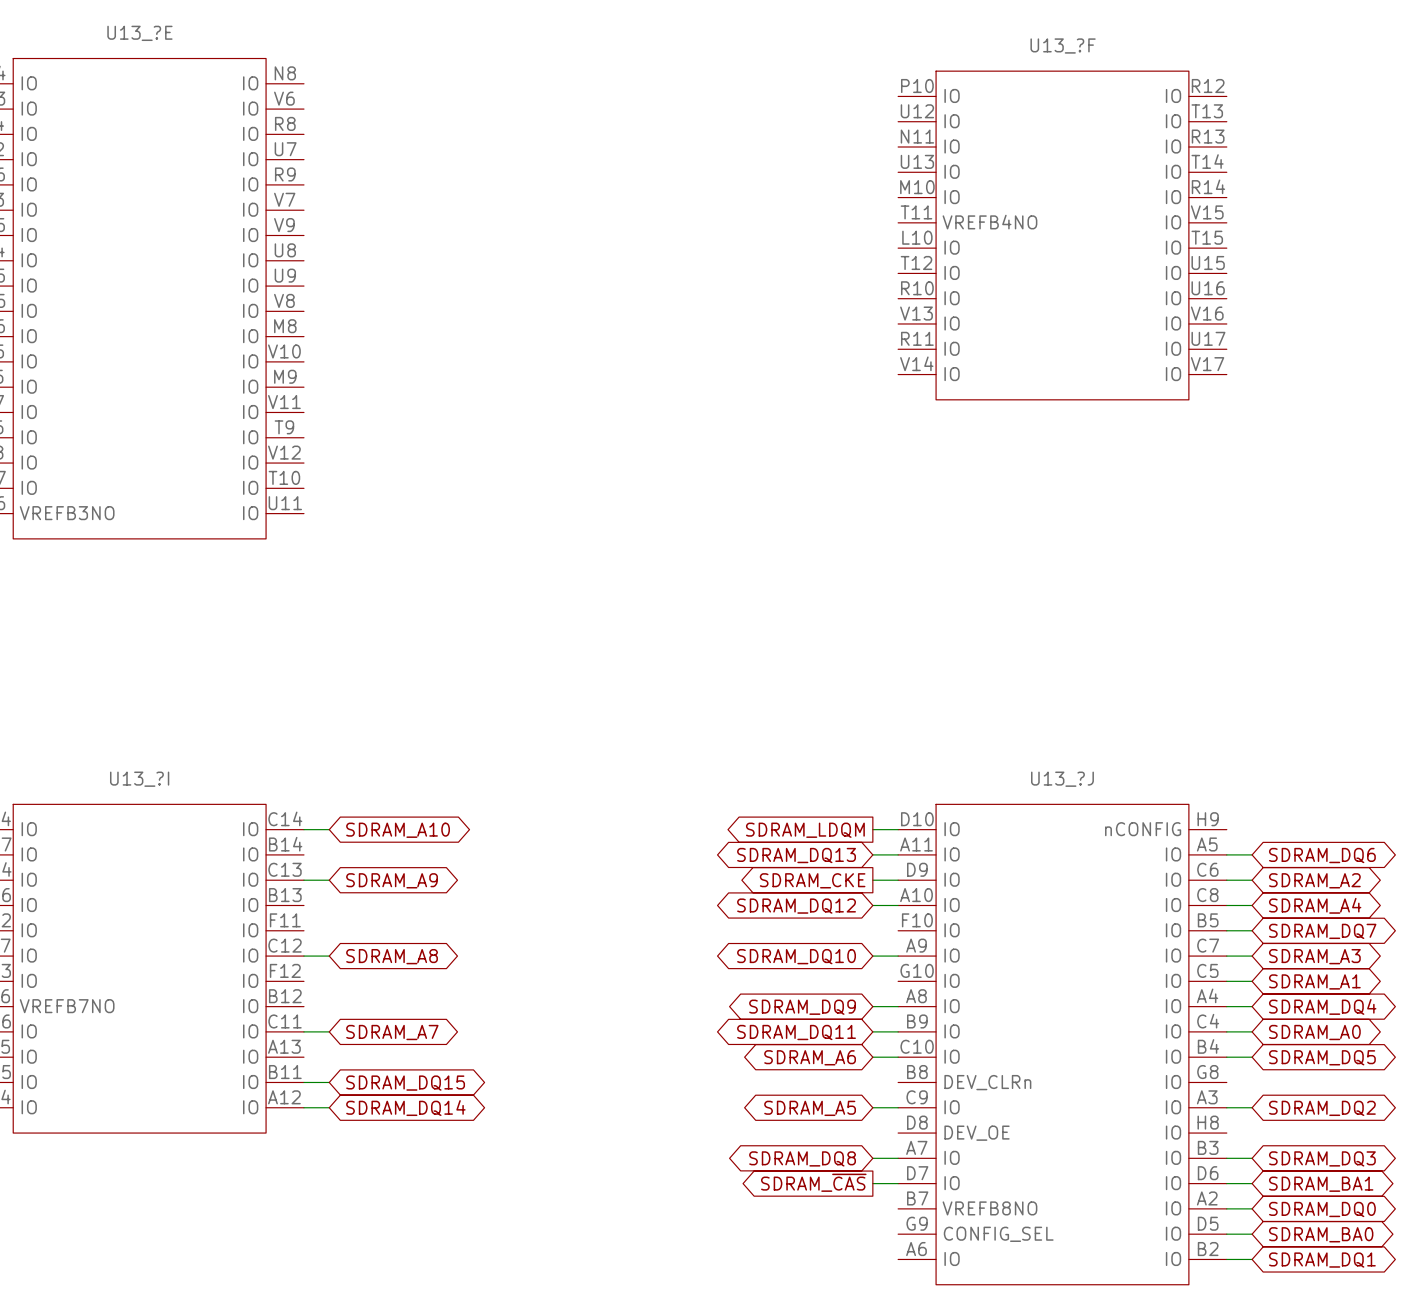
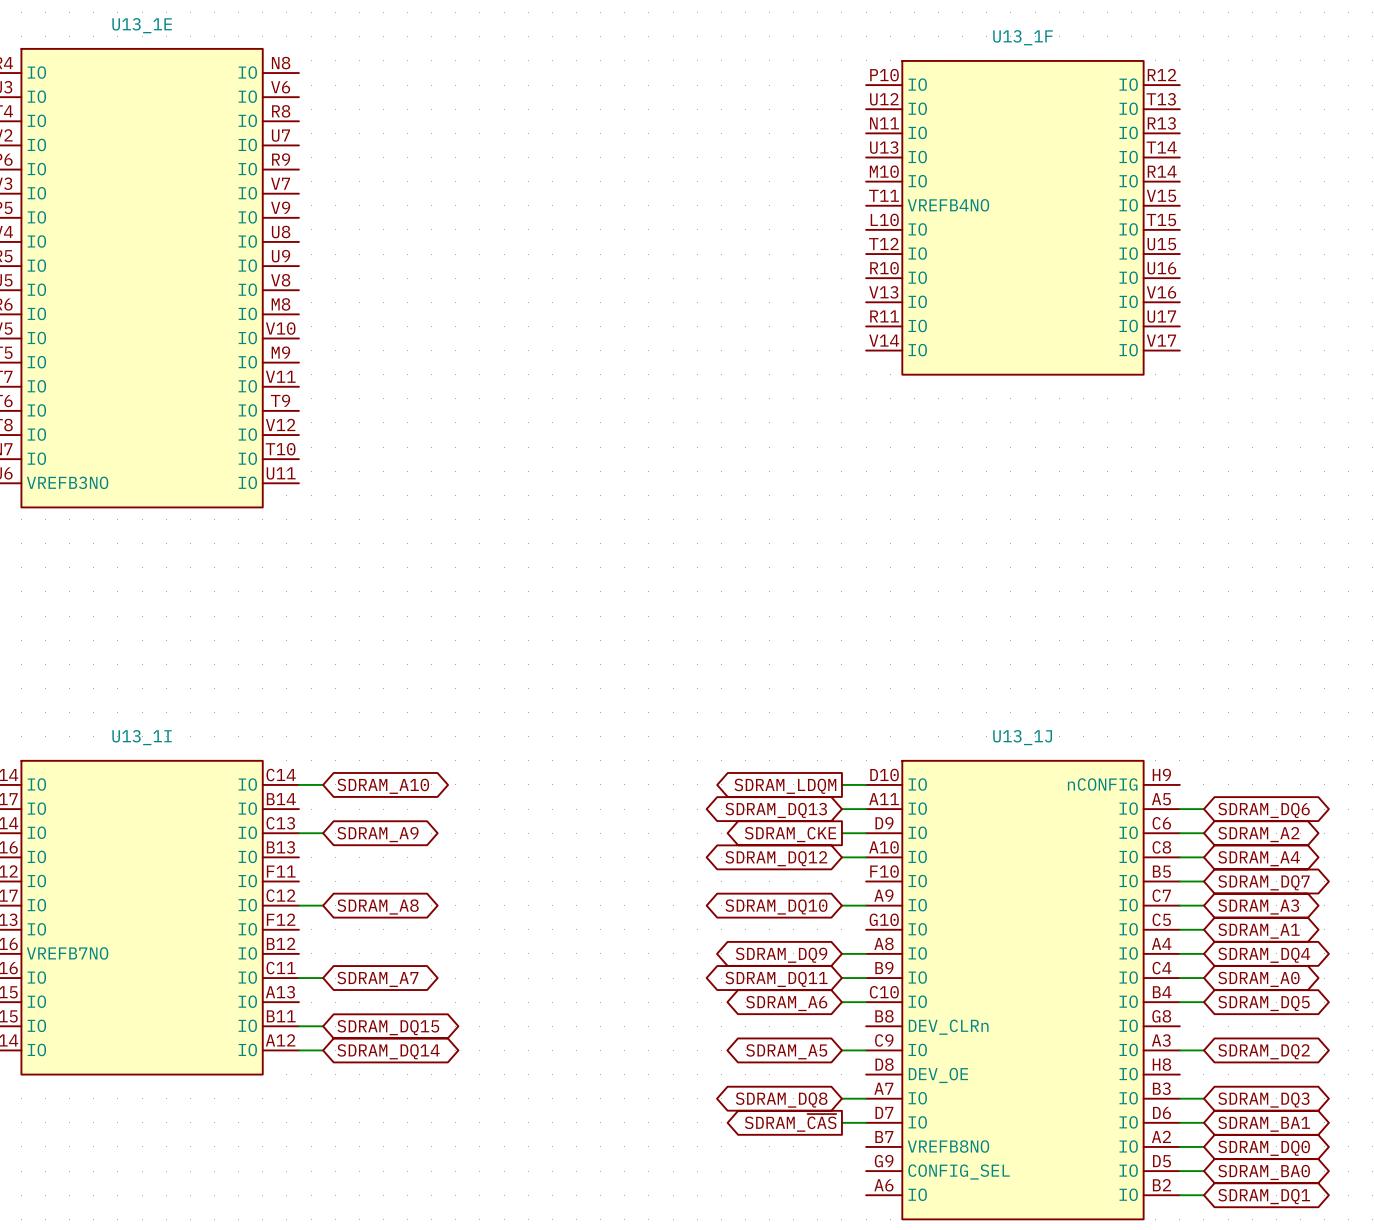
U13_?E name: U13_?E (139, 33) -> U13_1E (142, 25)
U13_?F name: U13_?F (1063, 46) -> U13_1F (1023, 37)
U13_?I name: U13_?I (139, 779) -> U13_1I (142, 737)
U13_?J name: U13_?J (1062, 779) -> U13_1J (1022, 737)

